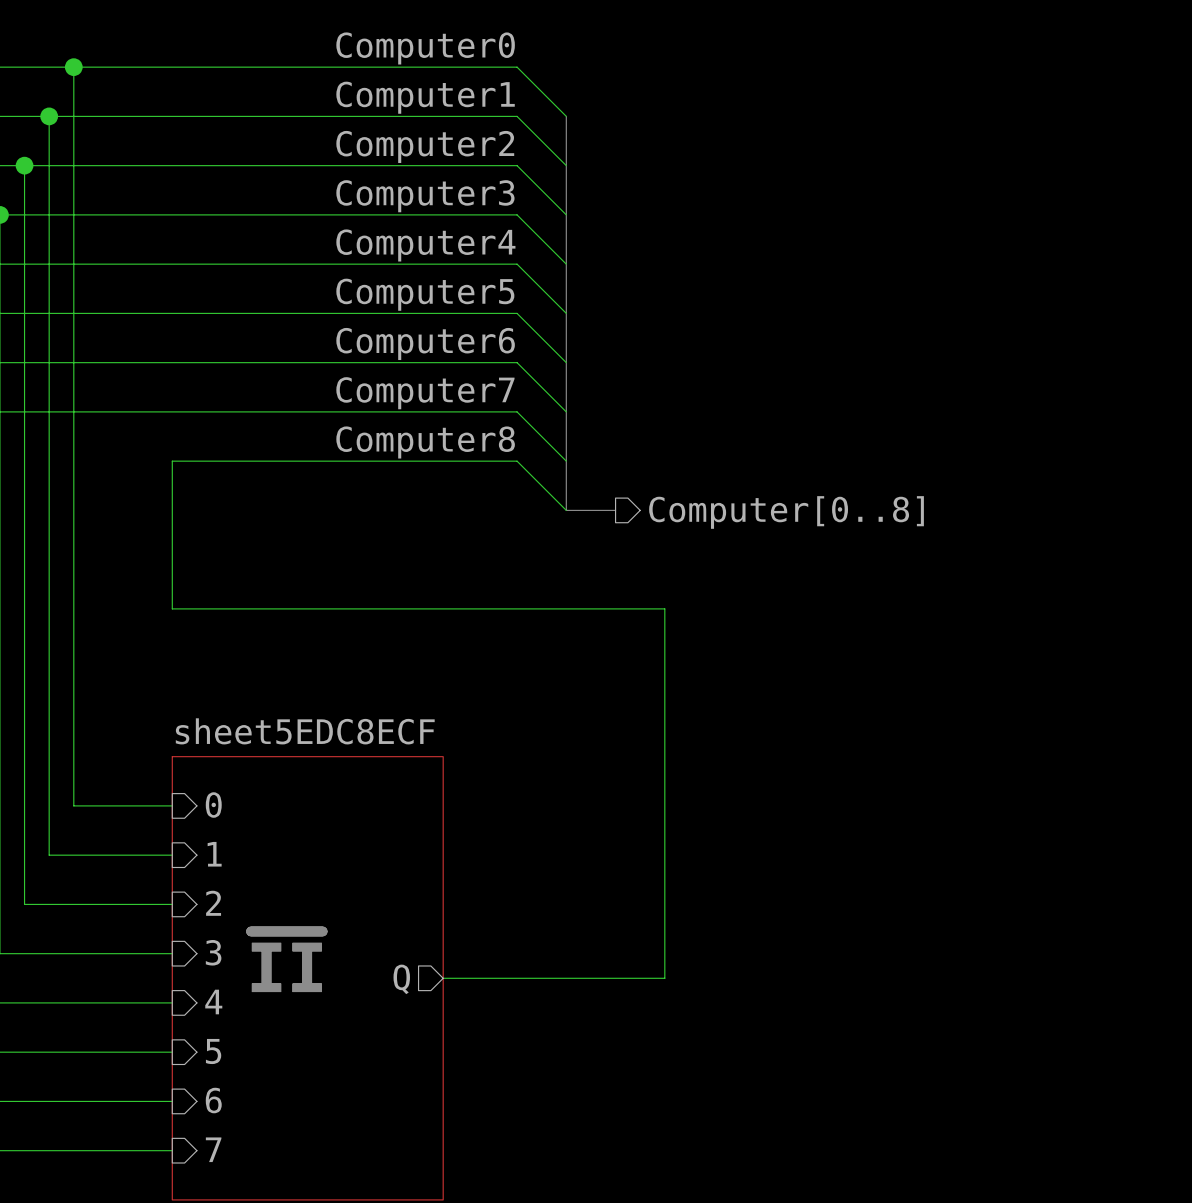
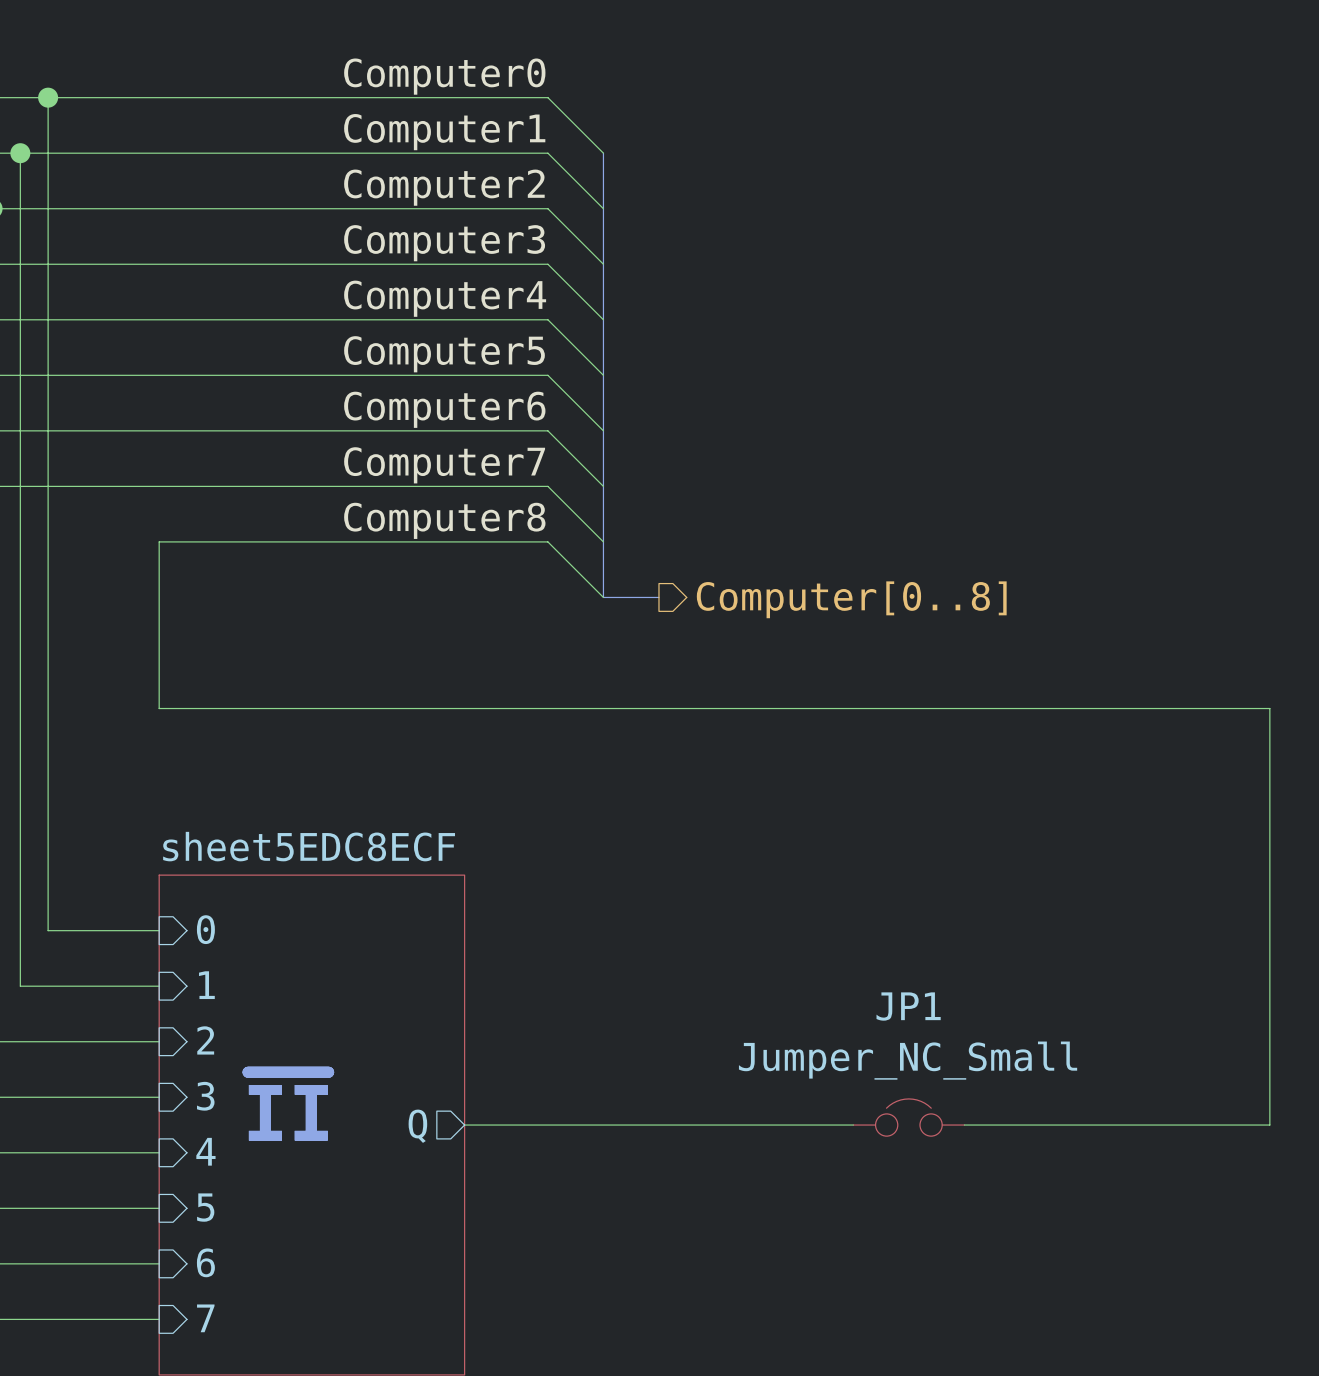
wire: (664, 608) (664, 978) -> (714, 708) (1269, 708) (1269, 1125) (964, 1125)
JP1: none -> Jumper_NC_Small (908, 1117)
wire: none -> (714, 1125) (853, 1125)

